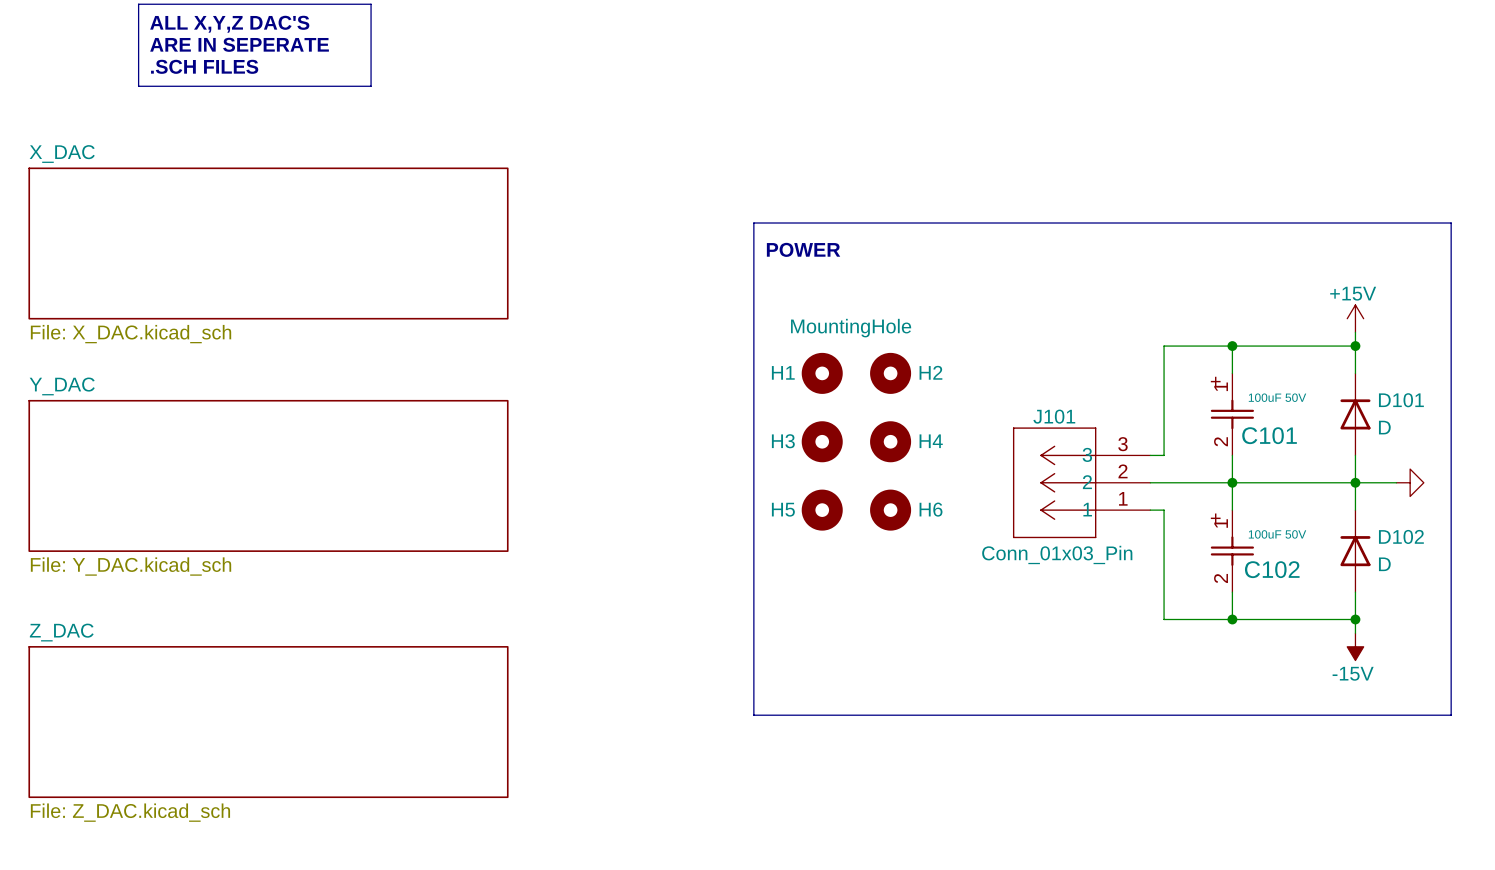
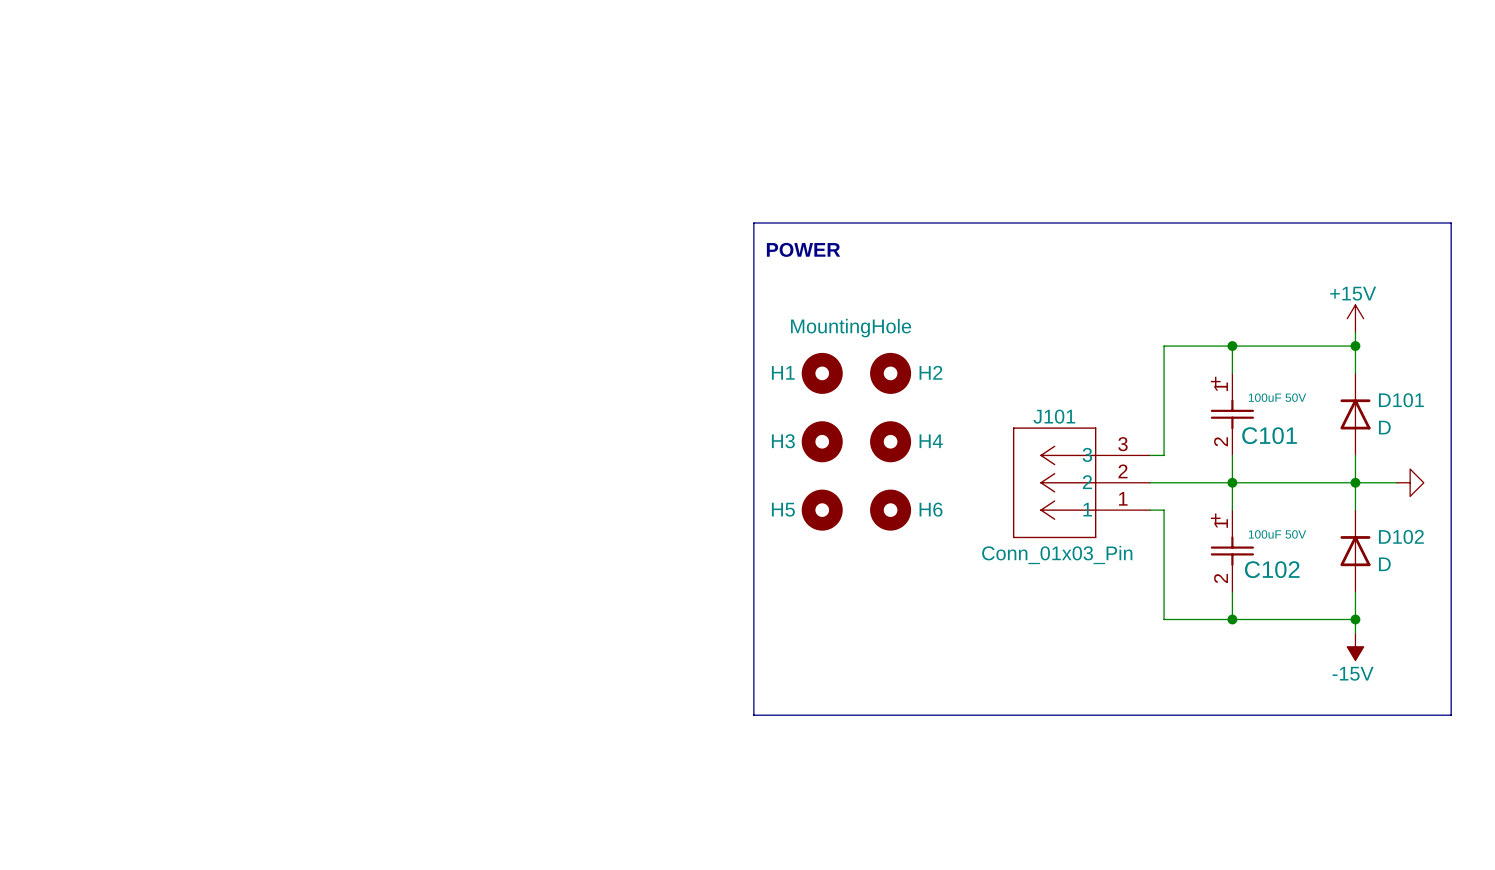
line: (138, 4) (371, 4) (371, 86) (138, 86) (138, 4) -> none
text: ALL X,Y,Z DAC'S (229, 24) -> none
text: ARE IN SEPERATE (239, 44) -> none
text: .SCH FILES (204, 66) -> none
sheet X_DAC: File: X_DAC.kicad_sch (268, 243) -> none
sheet Y_DAC: File: Y_DAC.kicad_sch (268, 475) -> none
sheet Z_DAC: File: Z_DAC.kicad_sch (268, 722) -> none

